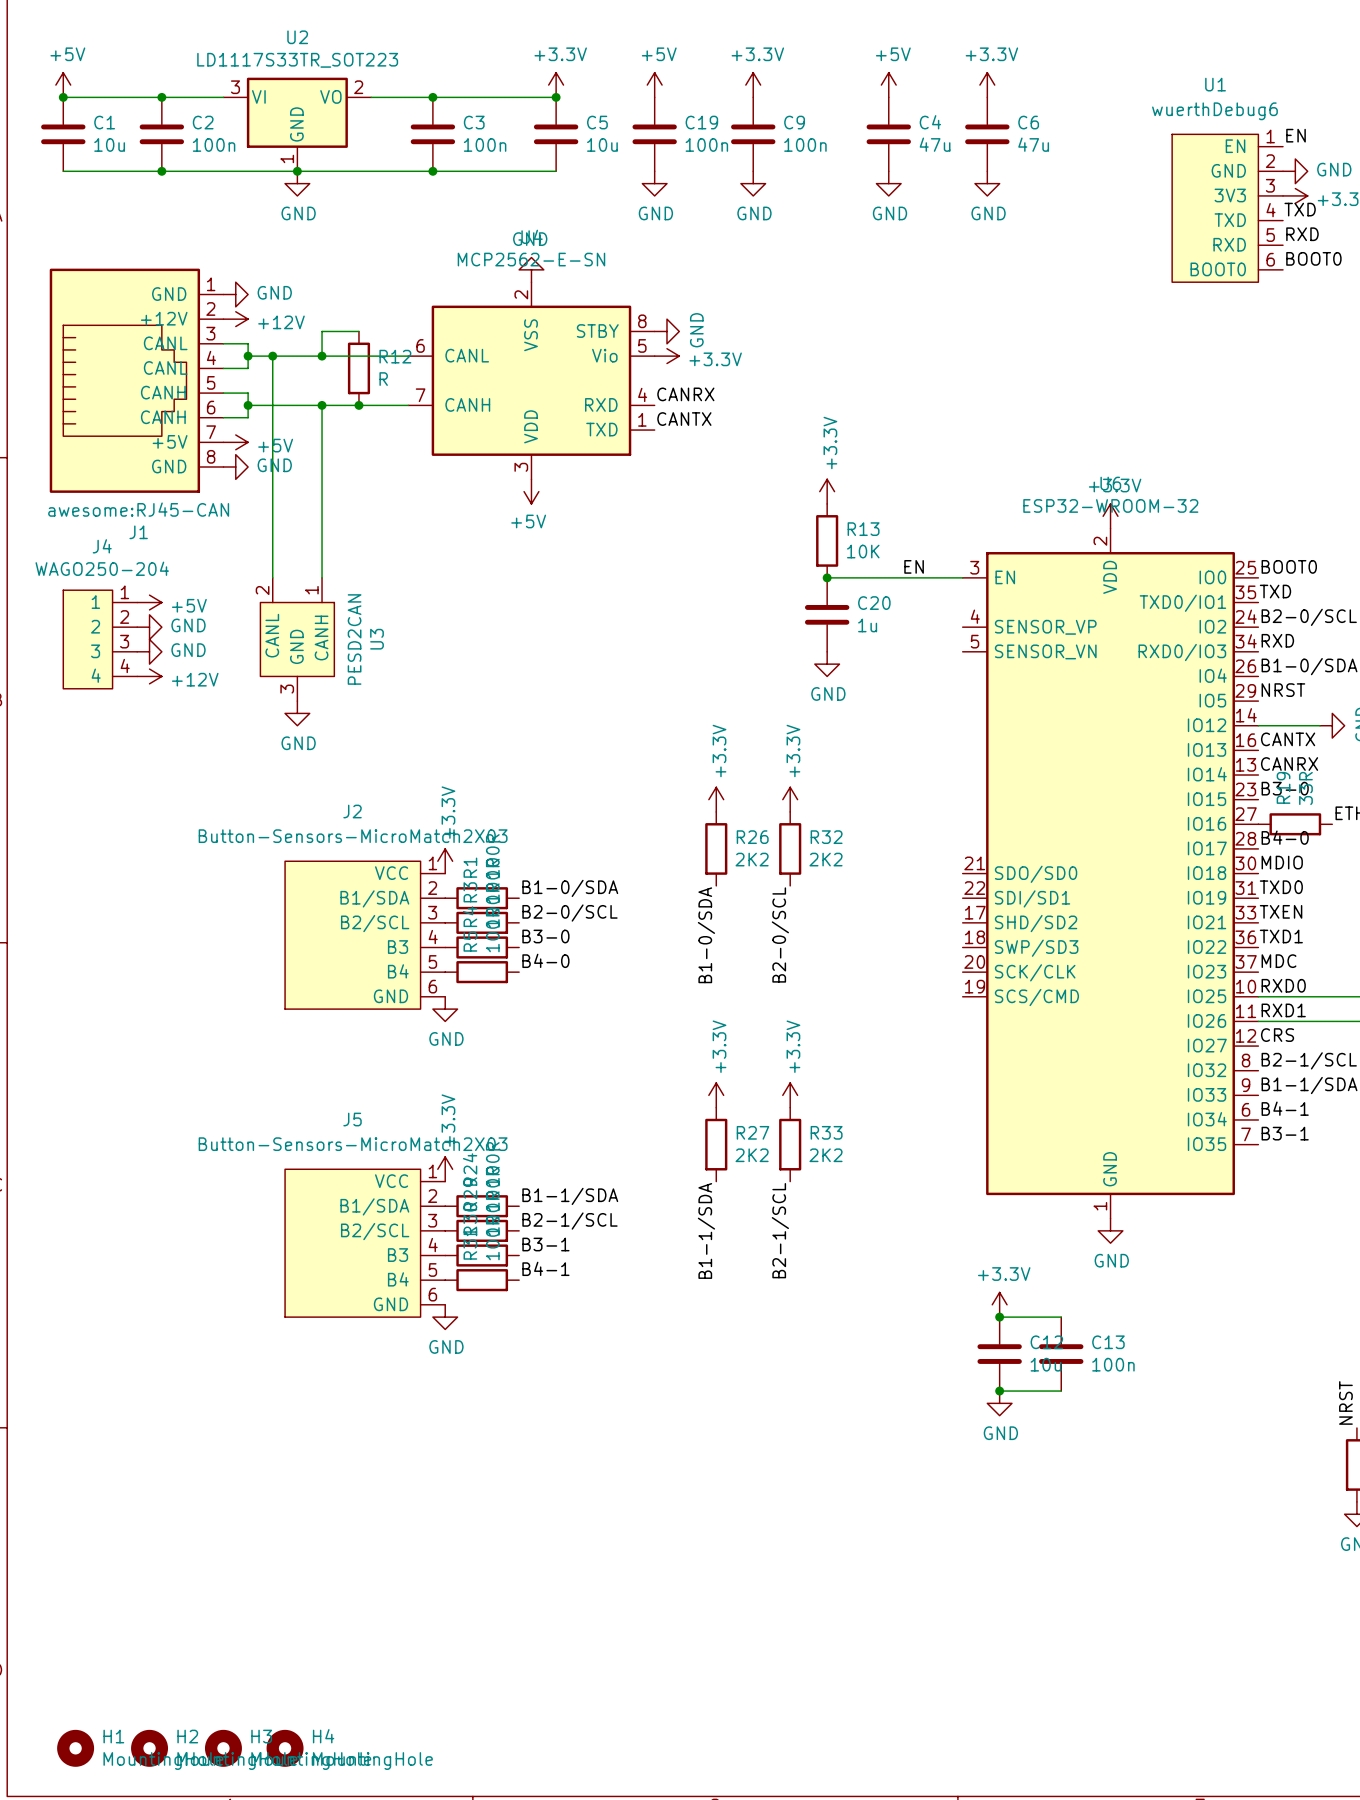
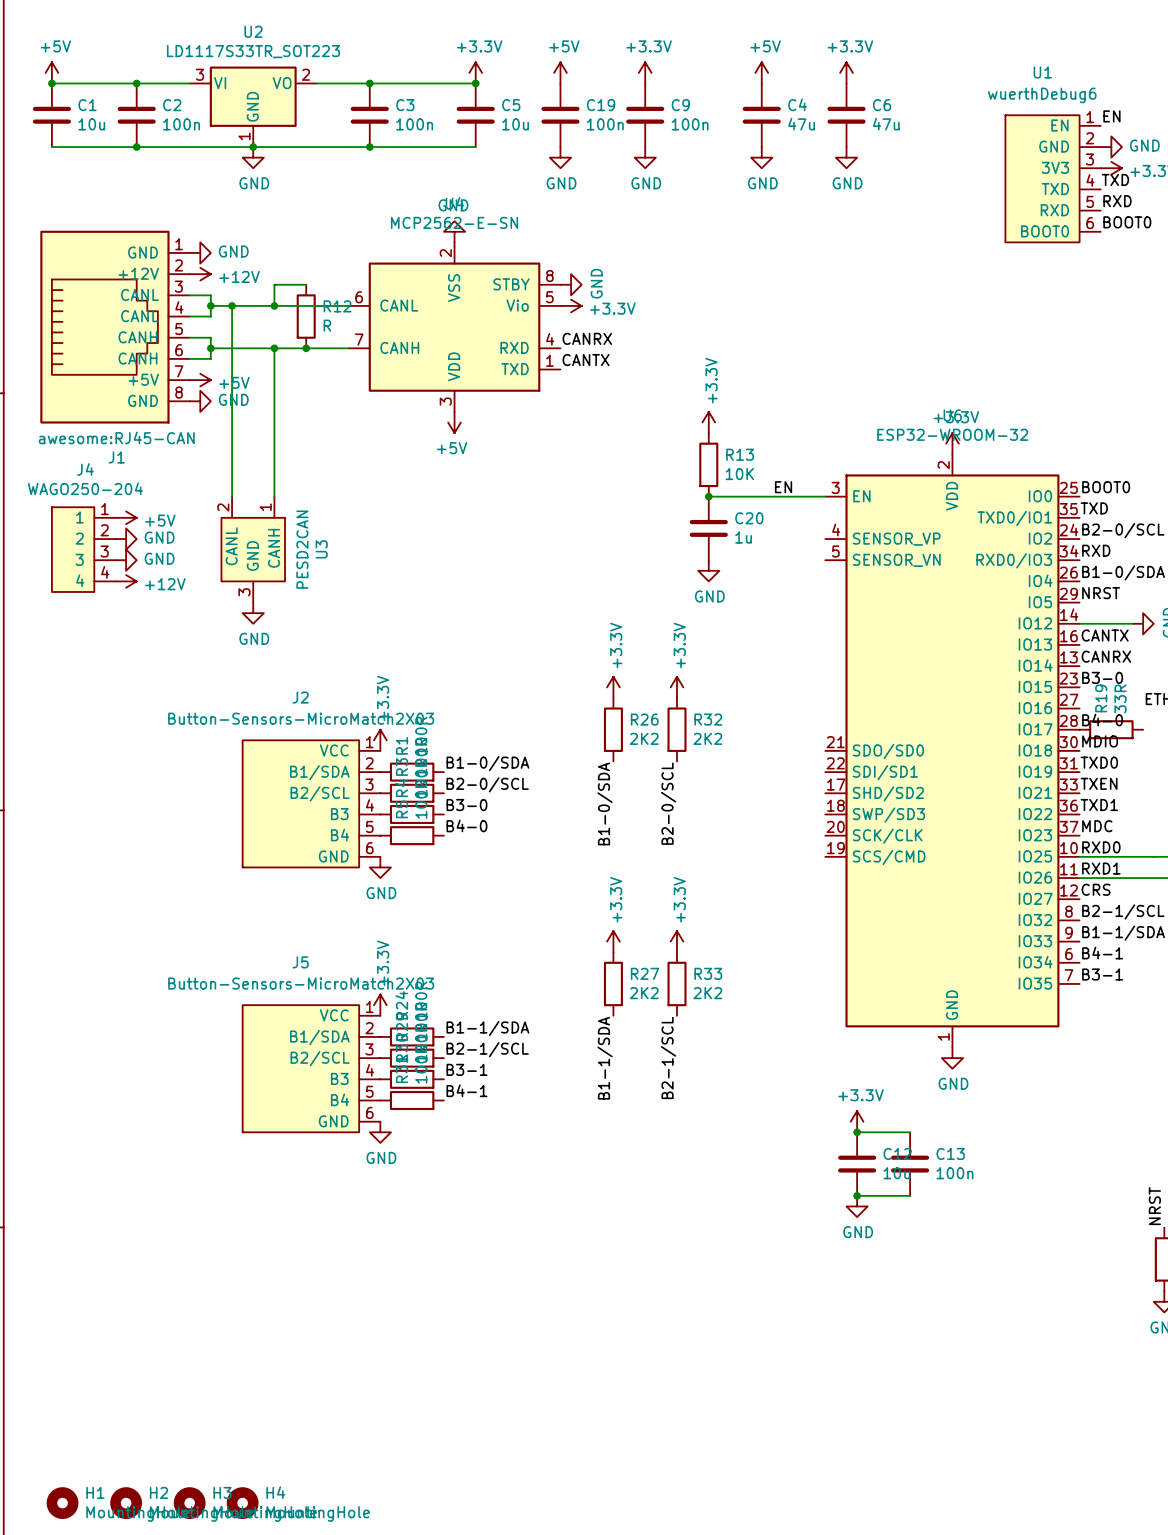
R19 position: (1295, 824) -> (1111, 729)

